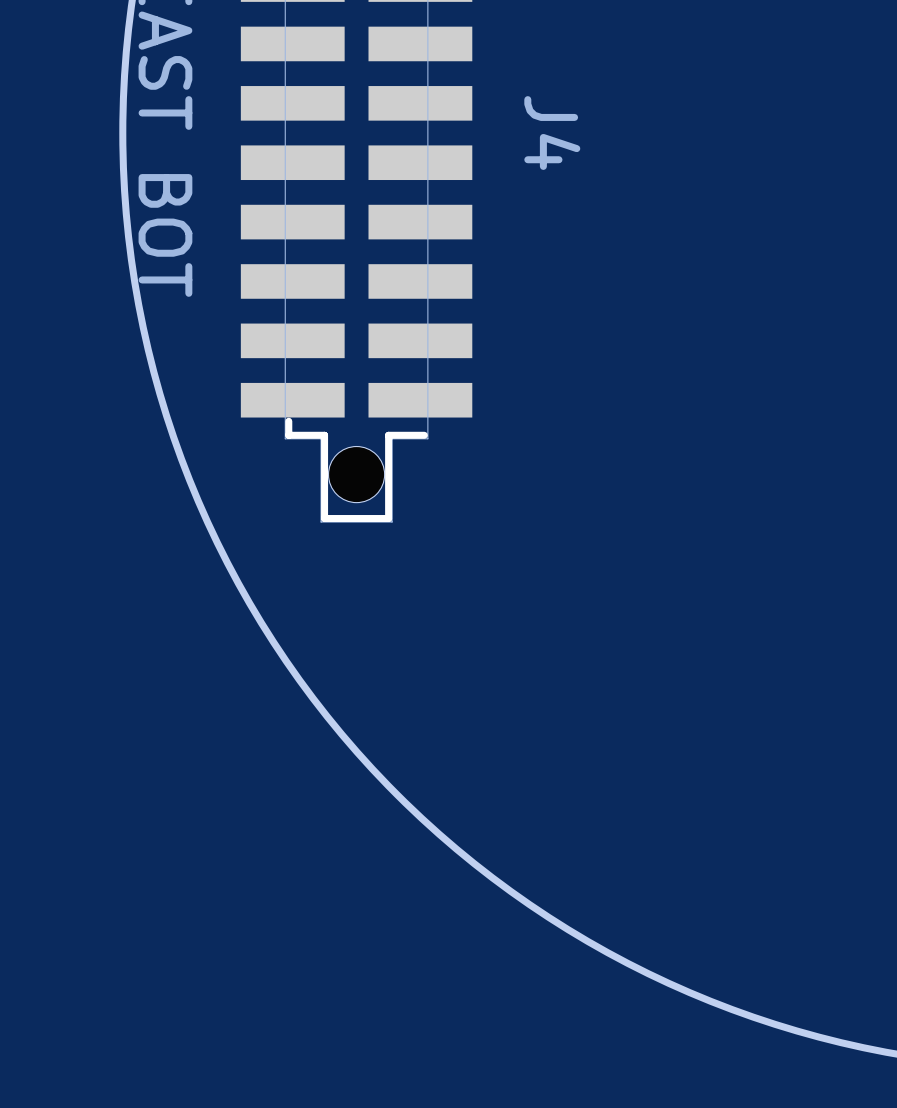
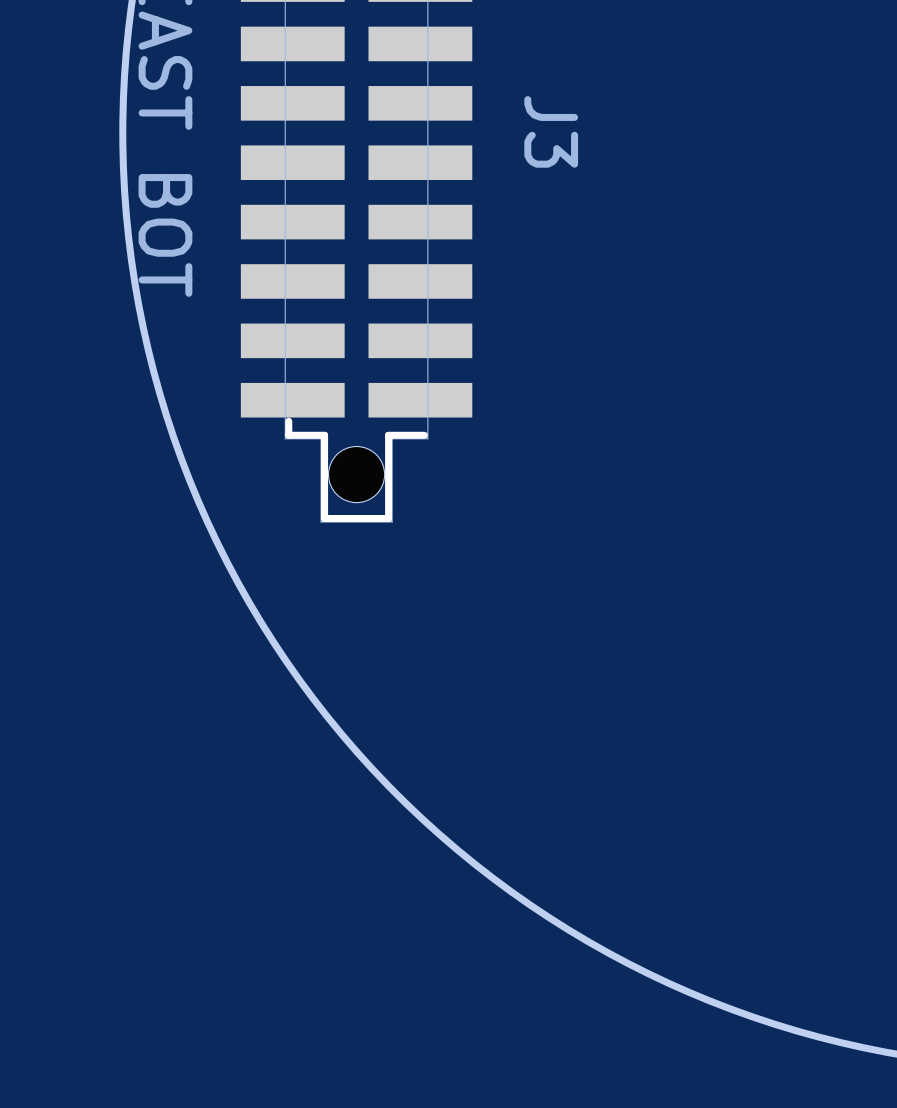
J4 name: J4 (552, 133) -> J3 (551, 131)

